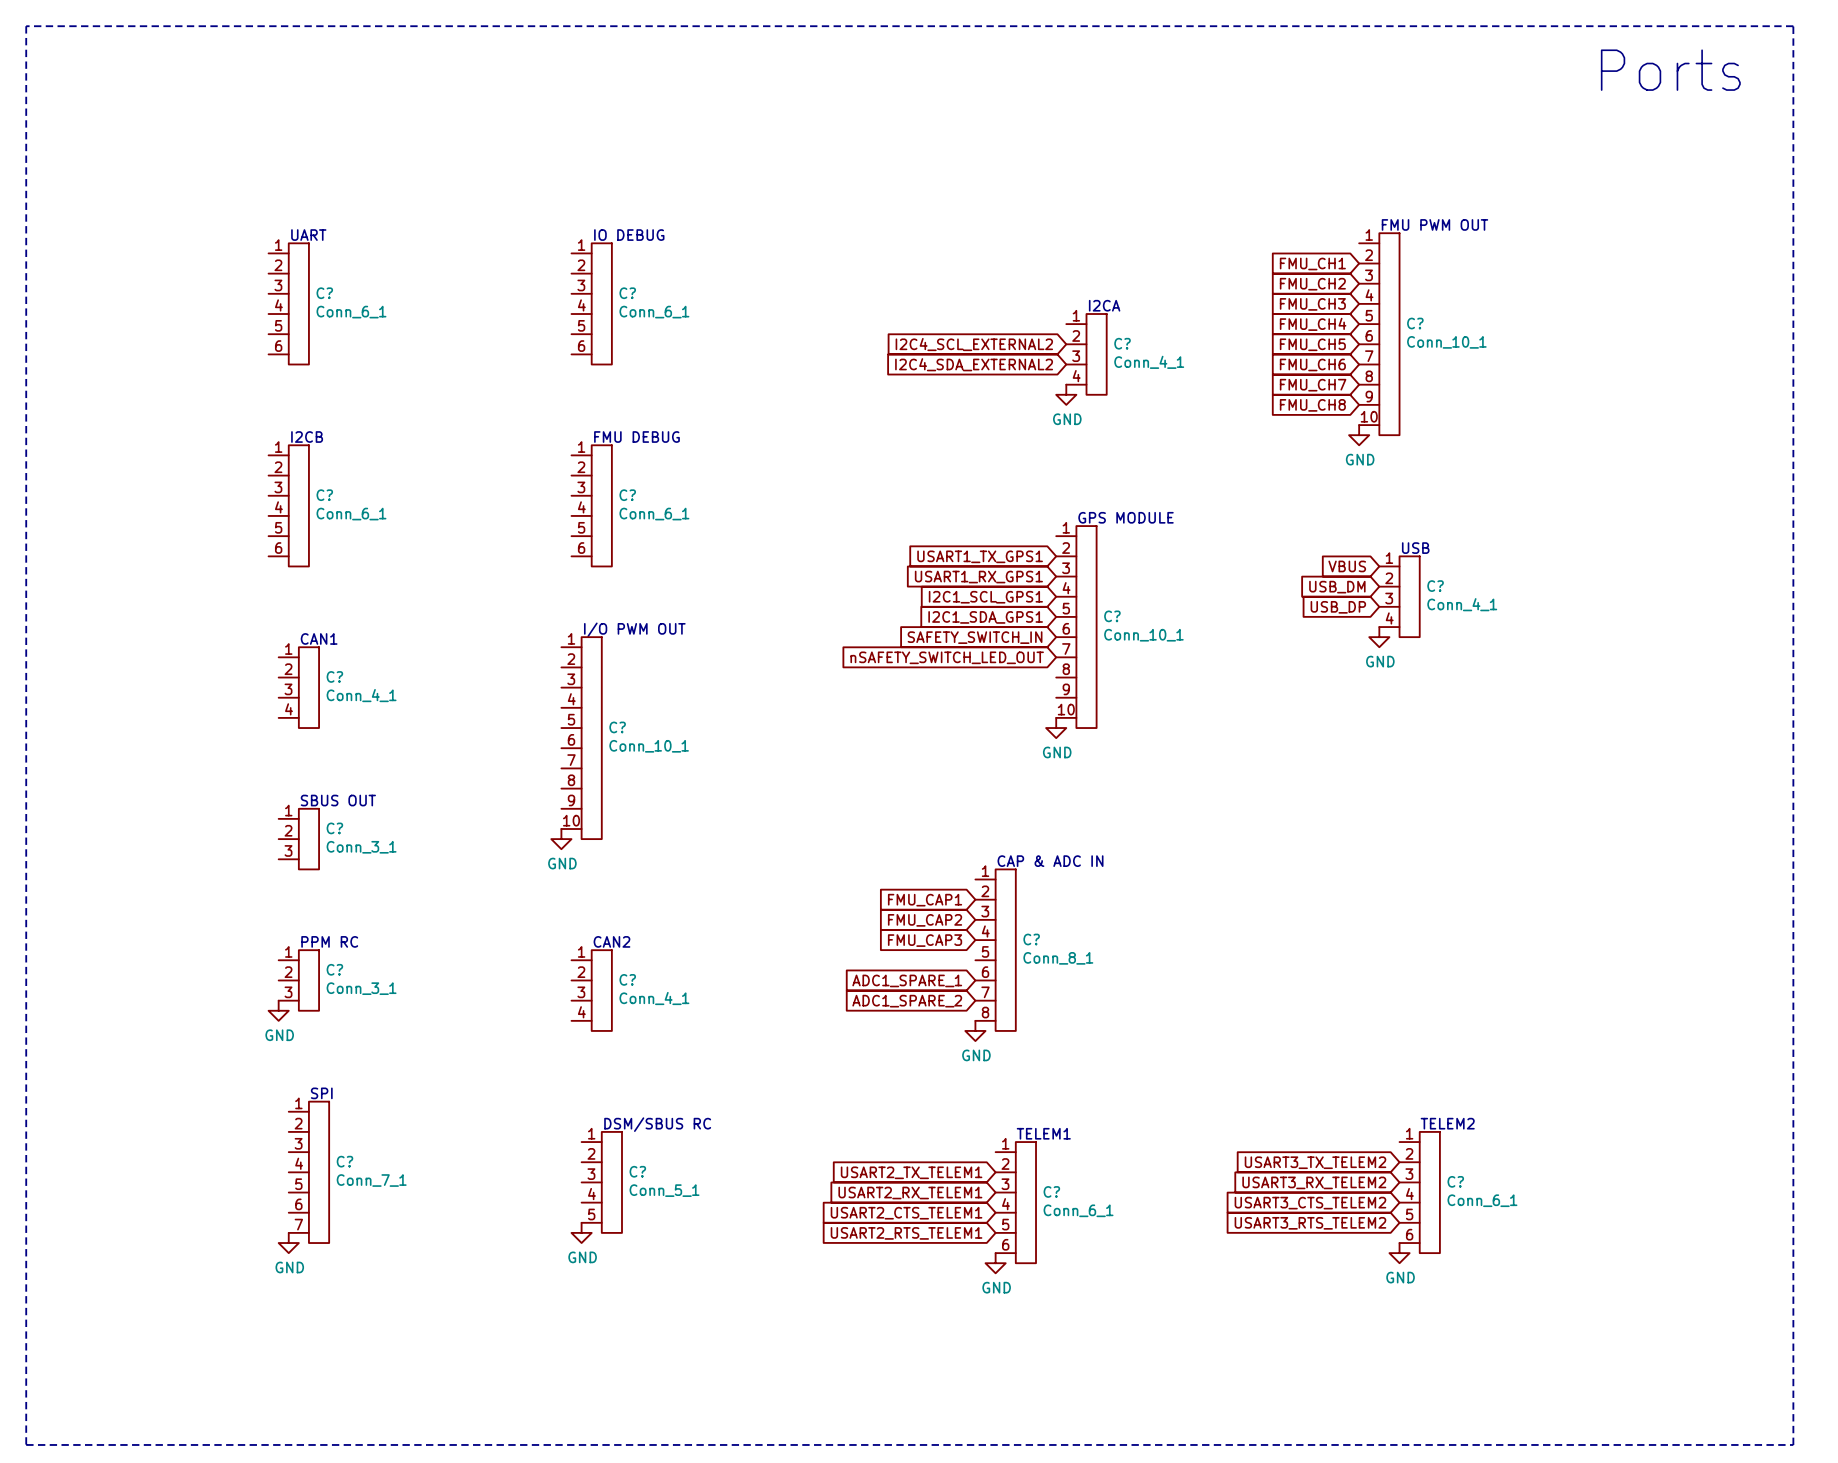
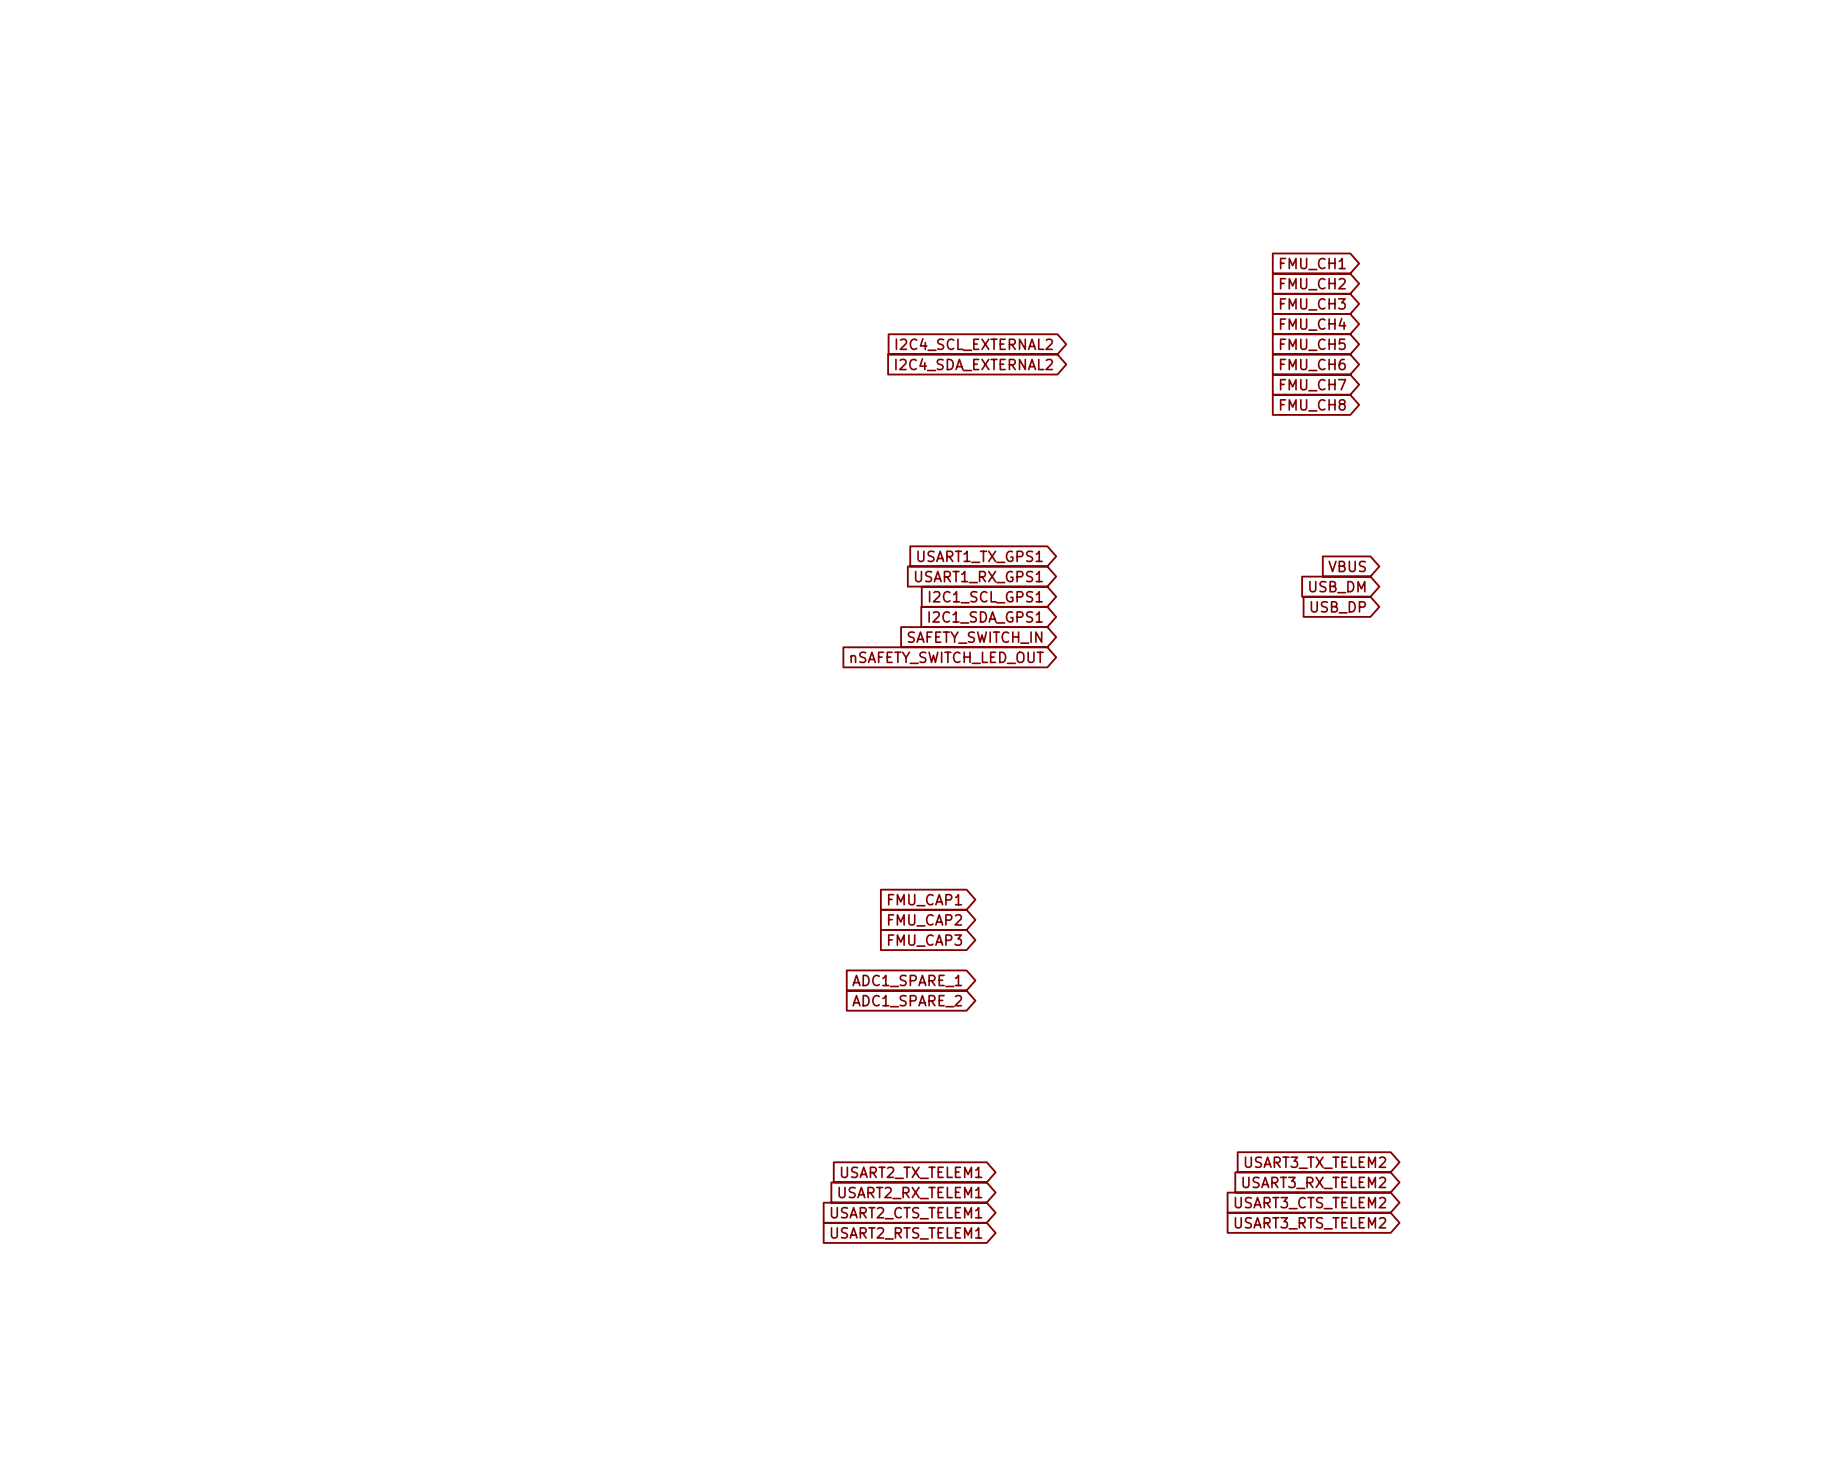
line: (26, 26) (26, 1444) (1793, 1444) (1793, 26) (26, 26) -> none
text: Ports (1670, 70) -> none
text: FMU PWM OUT (1434, 224) -> none
text: UART (308, 235) -> none
text: IO DEBUG (629, 235) -> none
C?: Conn_6_1 (288, 303) -> none
C?: Conn_6_1 (591, 303) -> none
text: I2CA (1104, 305) -> none
C?: Conn_10_1 (1379, 334) -> none
C?: Conn_4_1 (1086, 354) -> none
power symbol: GND (1066, 394) -> none
power symbol: GND (1359, 435) -> none
text: I2CB (307, 437) -> none
text: FMU DEBUG (636, 437) -> none
C?: Conn_6_1 (288, 505) -> none
C?: Conn_6_1 (591, 505) -> none
text: GPS MODULE (1126, 517) -> none
text: USB (1415, 548) -> none
C?: Conn_4_1 (1399, 596) -> none
C?: Conn_10_1 (1076, 627) -> none
text: I/O PWM OUT (634, 629) -> none
power symbol: GND (1379, 637) -> none
text: CAN1 (319, 638) -> none
C?: Conn_4_1 (298, 687) -> none
power symbol: GND (1056, 728) -> none
C?: Conn_10_1 (581, 738) -> none
text: SBUS OUT (338, 800) -> none
C?: Conn_3_1 (298, 839) -> none
power symbol: GND (561, 839) -> none
text: CAP & ADC IN (1050, 861) -> none
text: PPM RC (329, 941) -> none
text: CAN2 (611, 941) -> none
C?: Conn_8_1 (995, 950) -> none
C?: Conn_3_1 (298, 980) -> none
C?: Conn_4_1 (591, 990) -> none
power symbol: GND (278, 1010) -> none
power symbol: GND (975, 1030) -> none
text: SPI (321, 1093) -> none
text: TELEM2 (1447, 1123) -> none
text: DSM/SBUS RC (657, 1124) -> none
text: TELEM1 (1043, 1133) -> none
C?: Conn_7_1 (308, 1172) -> none
C?: Conn_5_1 (601, 1182) -> none
C?: Conn_6_1 (1419, 1192) -> none
C?: Conn_6_1 (1015, 1202) -> none
power symbol: GND (581, 1232) -> none
power symbol: GND (288, 1243) -> none
power symbol: GND (1399, 1253) -> none
power symbol: GND (995, 1263) -> none

